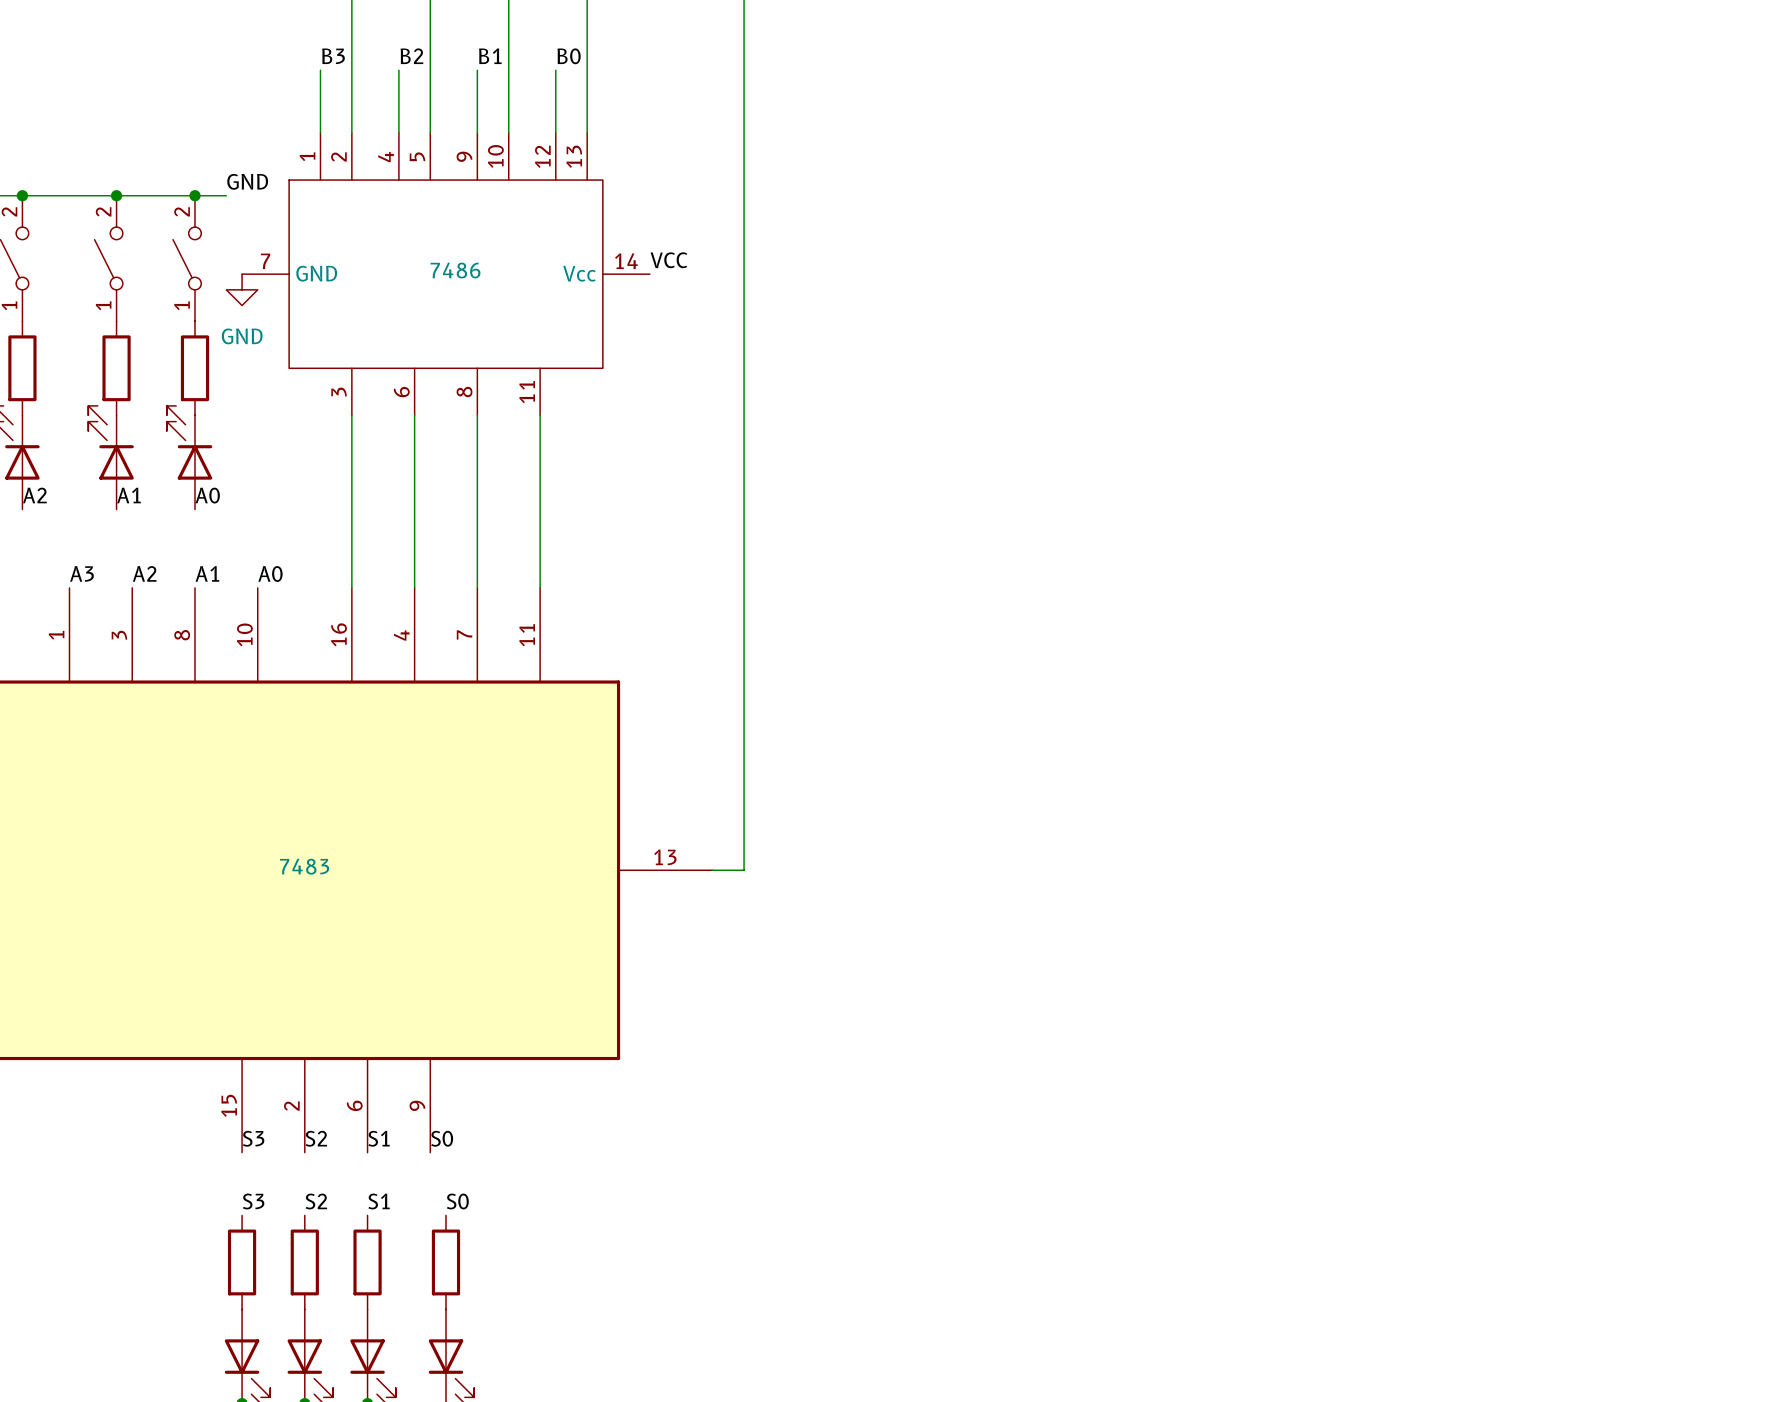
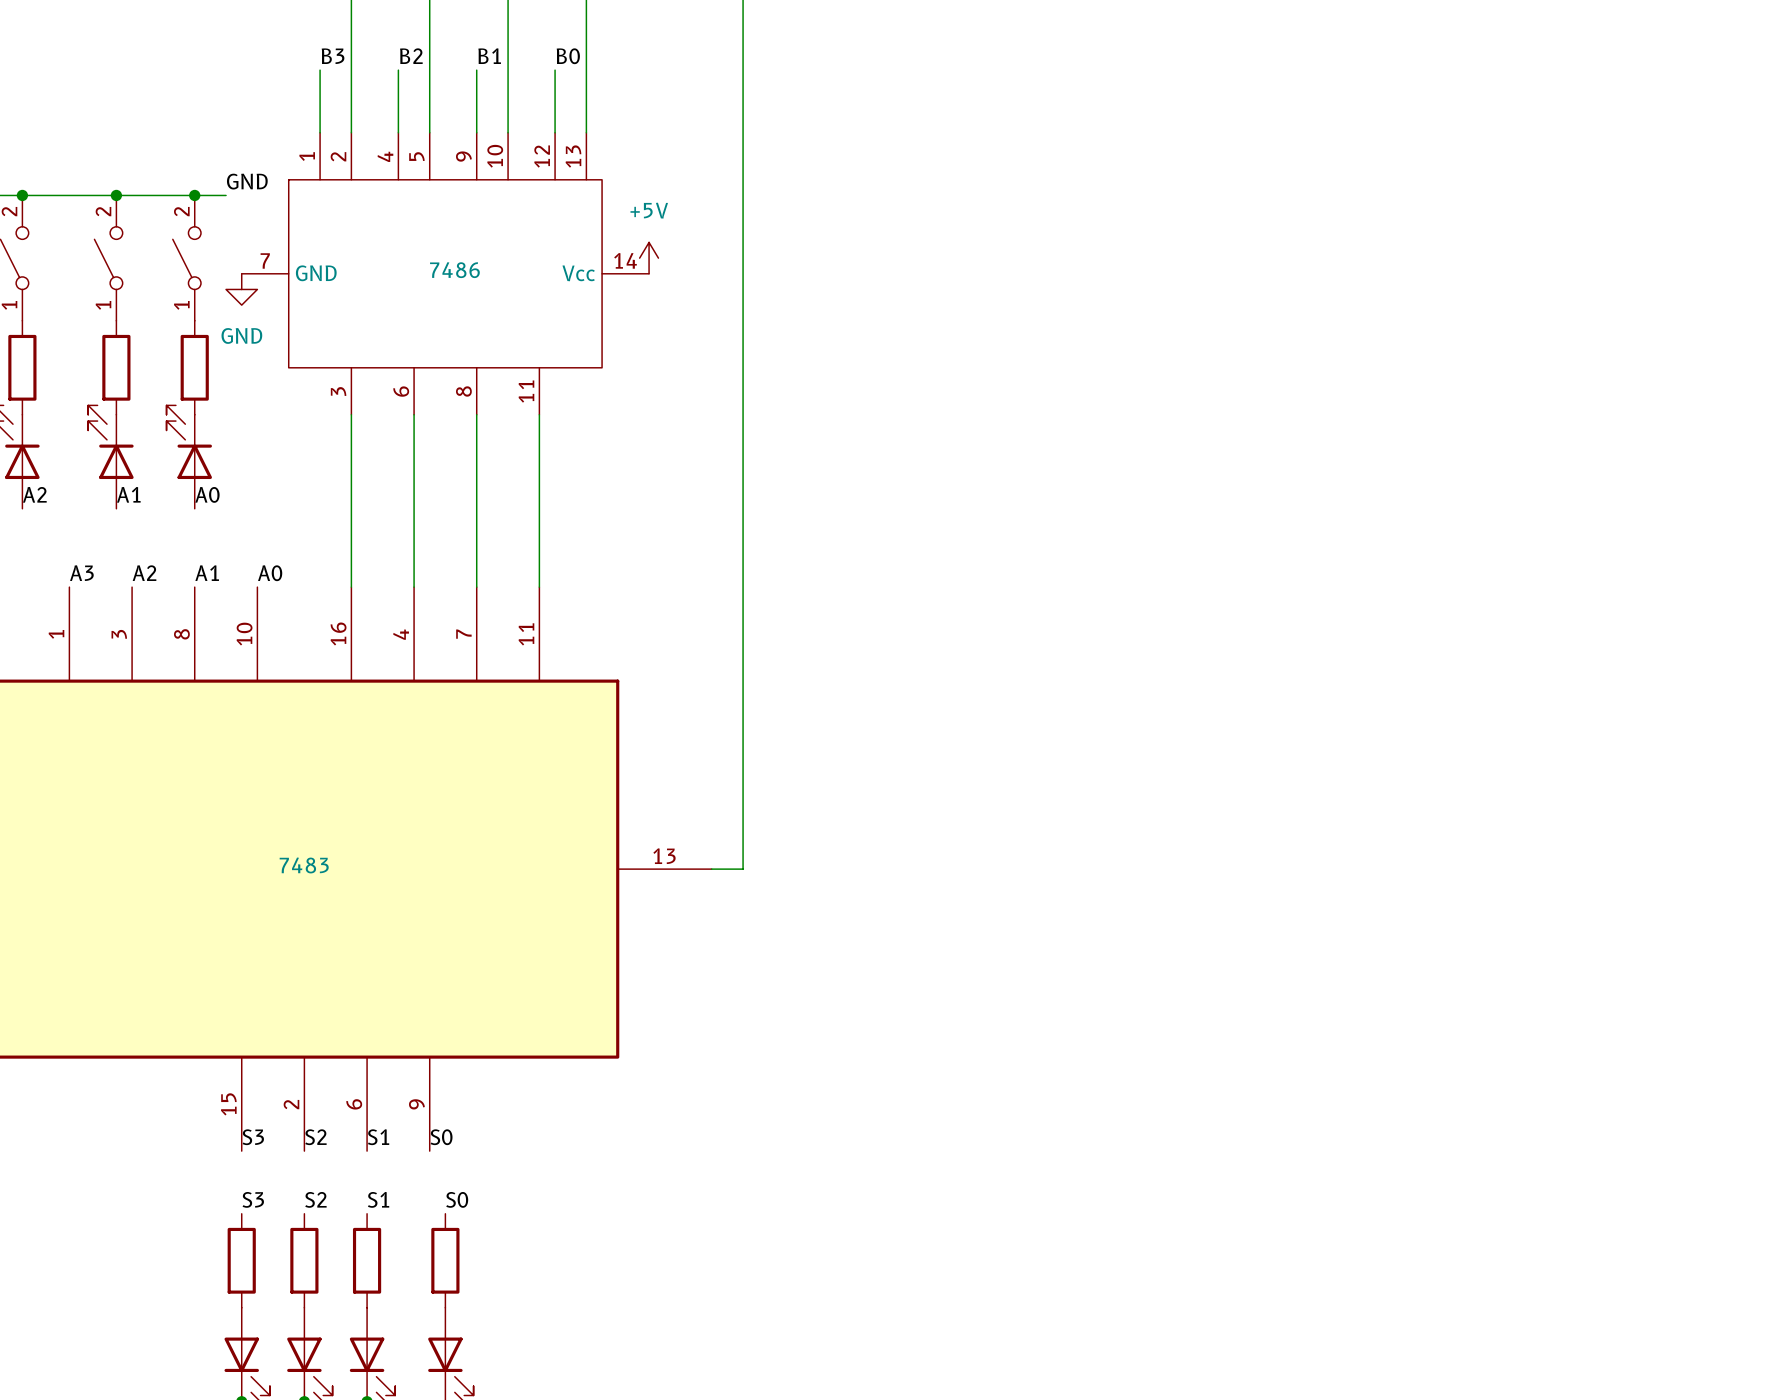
power symbol: none -> +5V (649, 258)
label: VCC (668, 260) -> none

